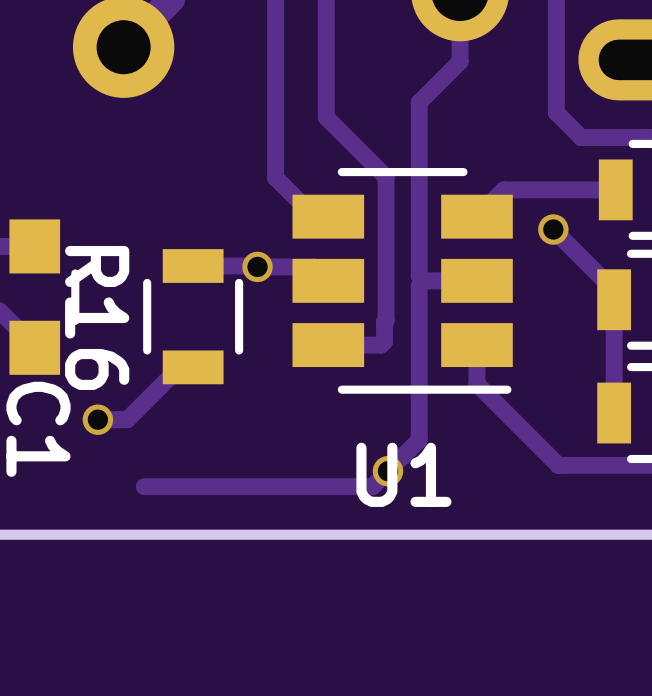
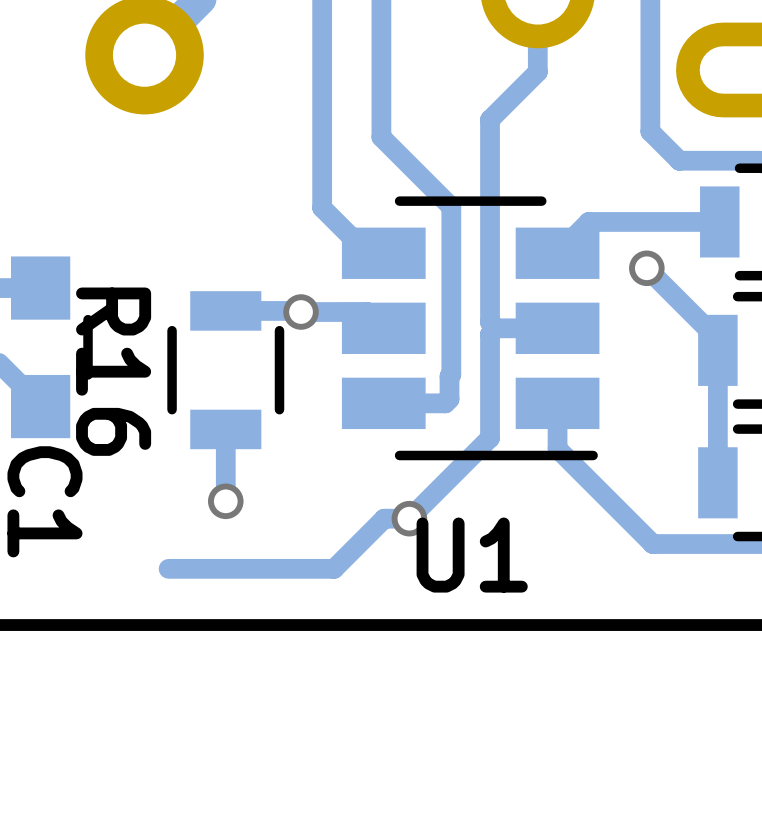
track: (193, 367) (179, 367) (127, 419) (97, 419) -> (225, 429) (225, 501)
track: (419, 374) (419, 439) (372, 486) (285, 486) -> (490, 438) (409, 518) (384, 518) (334, 568)
via position: (97, 419) -> (225, 501)
via position: (387, 471) -> (409, 518)

